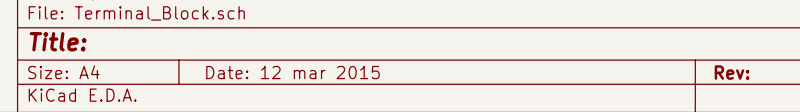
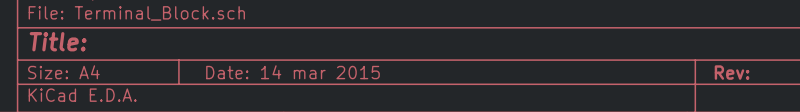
title block: Date: 12 mar 2015 (292, 72) -> Date: 14 mar 2015 (292, 72)

